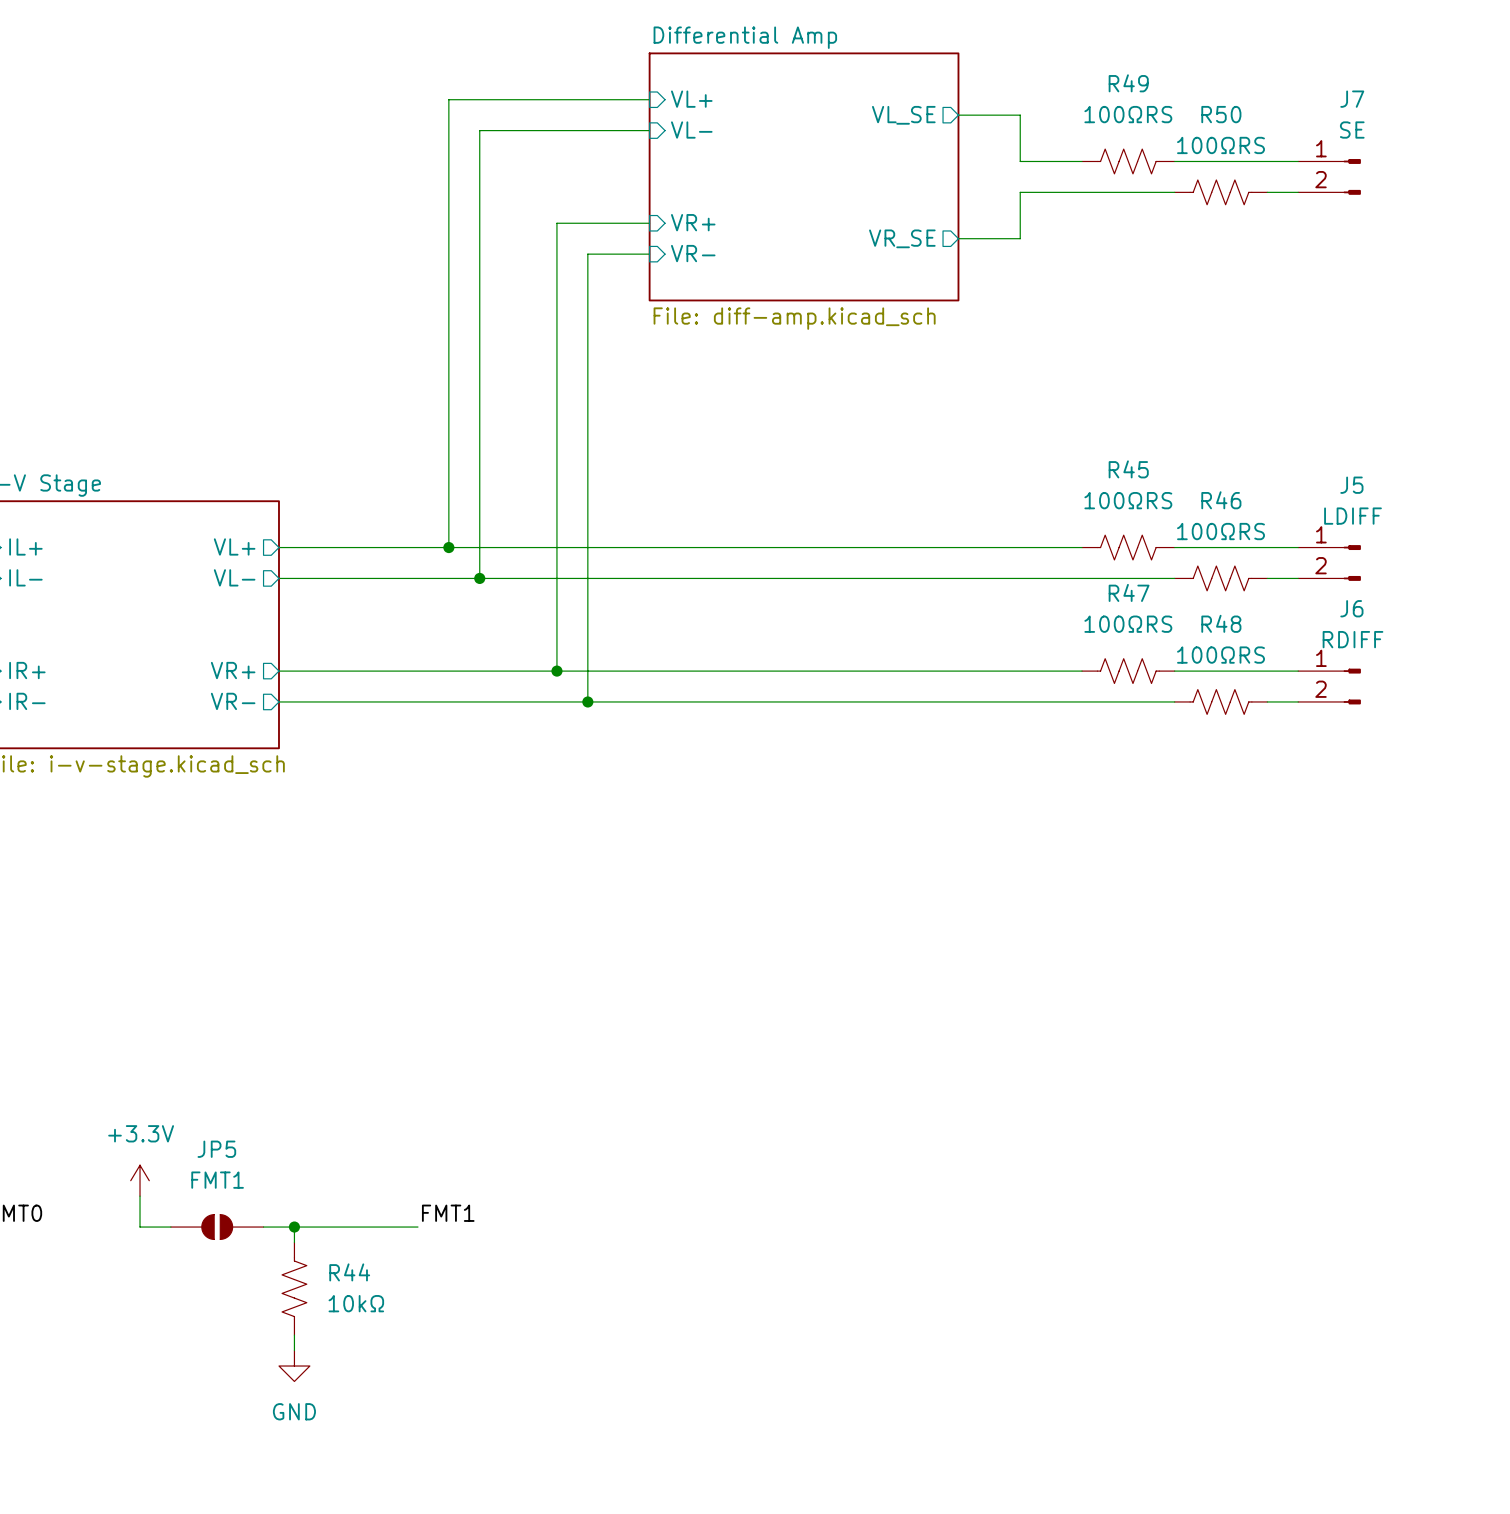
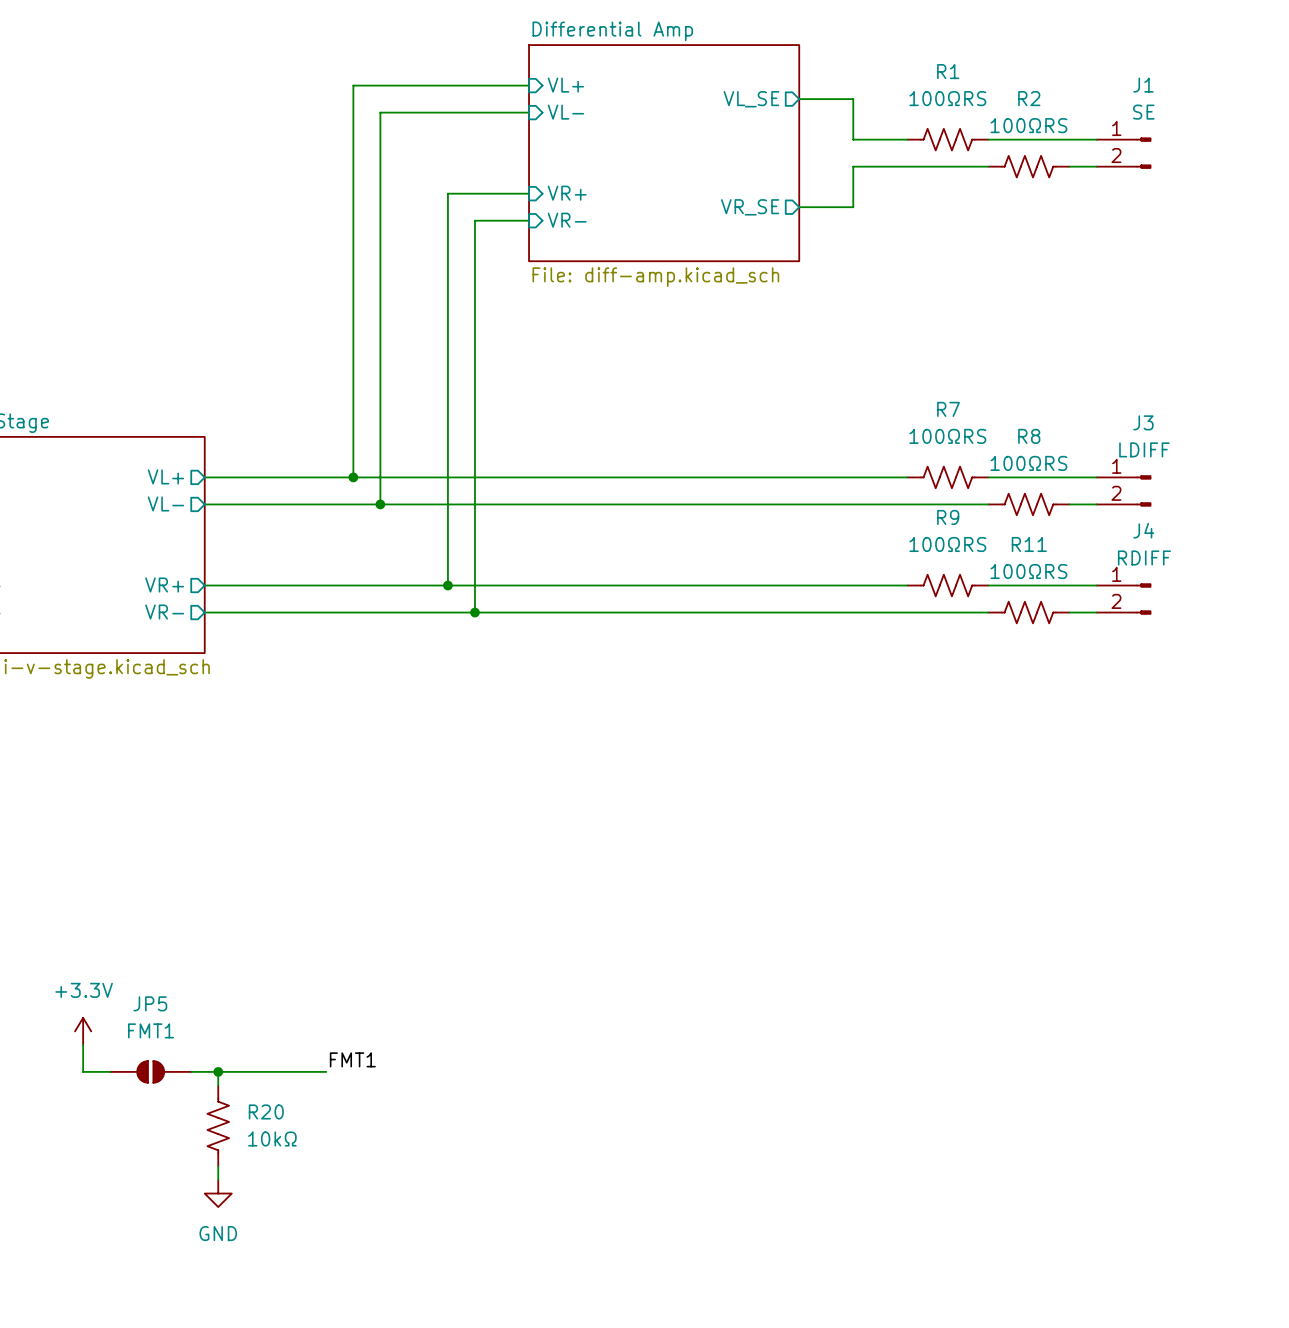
R49 name: R49 (1128, 83) -> R1 (948, 71)
J7 name: J7 (1352, 99) -> J1 (1143, 85)
R50 name: R50 (1221, 114) -> R2 (1029, 98)
R45 name: R45 (1128, 469) -> R7 (948, 409)
J5 name: J5 (1351, 485) -> J3 (1143, 422)
R46 name: R46 (1221, 500) -> R8 (1029, 436)
R47 name: R47 (1129, 592) -> R9 (948, 517)
J6 name: J6 (1351, 608) -> J4 (1143, 530)
R48 name: R48 (1221, 623) -> R11 (1029, 544)
R44 name: R44 (349, 1272) -> R20 (266, 1111)

